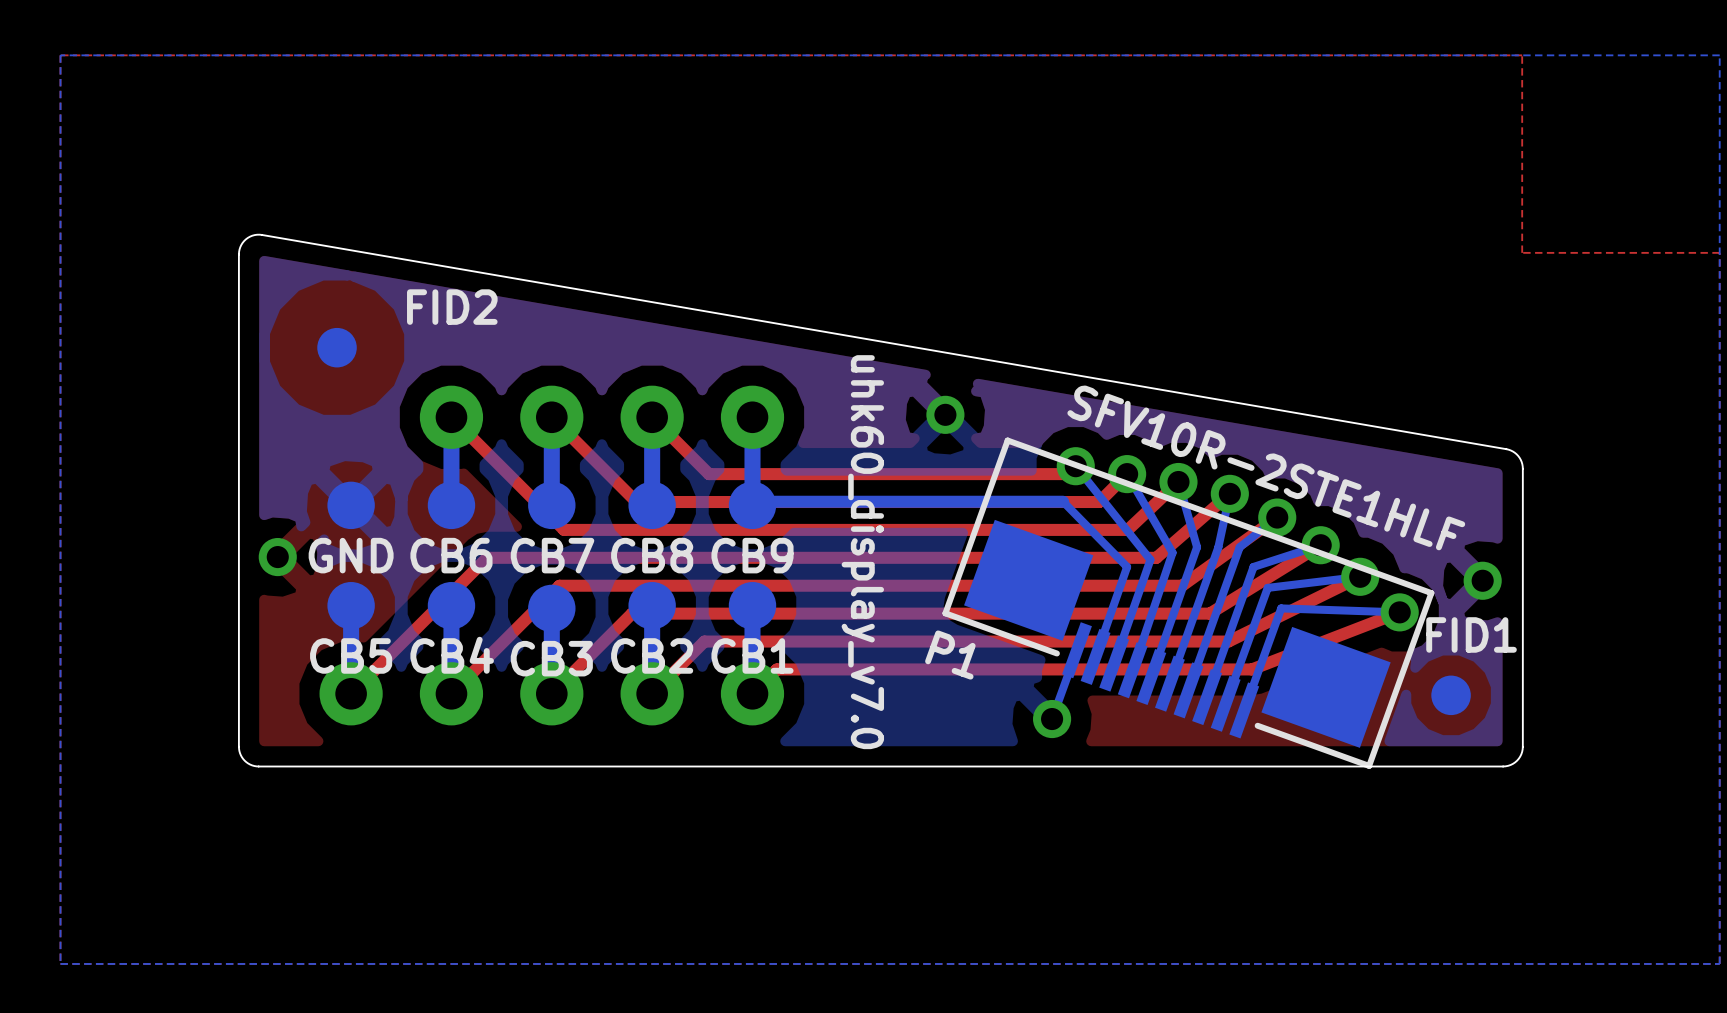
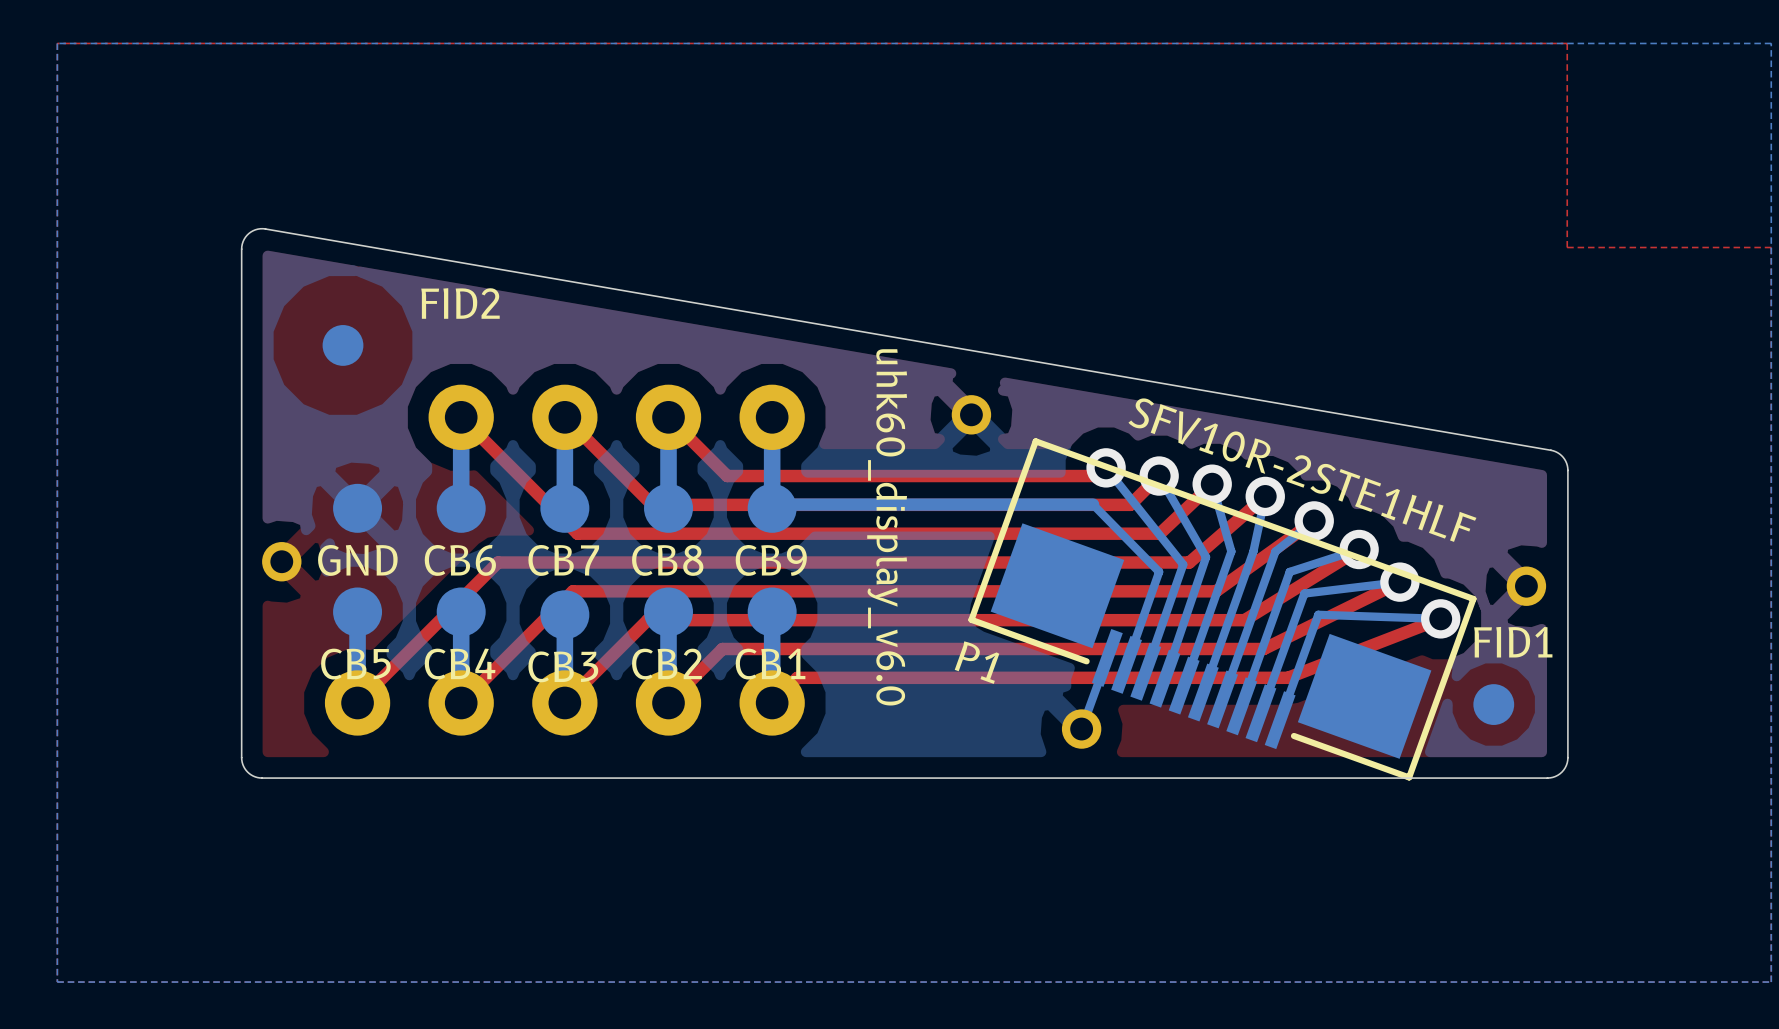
text: uhk60_display_v7.0 (862, 552) -> uhk60_display_v6.0 (887, 527)

